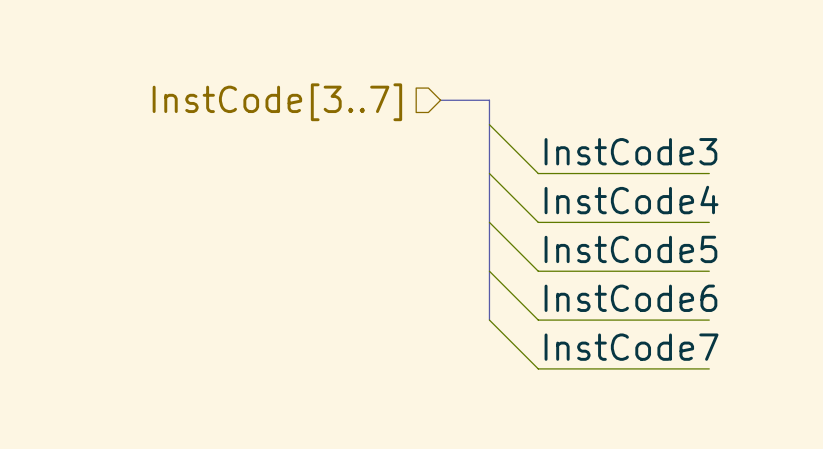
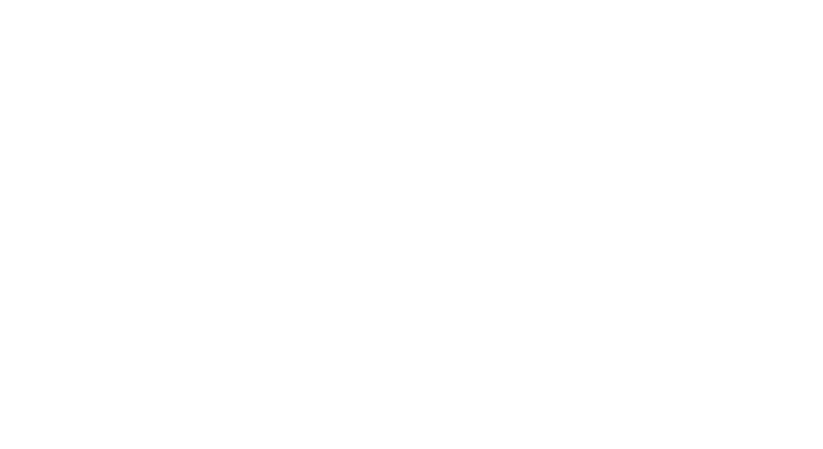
bus: (440, 100) (489, 100) (489, 320) -> none
hierarchical label: InstCode[3..7] (277, 102) -> none
wire: (489, 124) (538, 173) (709, 173) -> none
label: InstCode3 (630, 151) -> none
wire: (489, 173) (538, 222) (709, 222) -> none
label: InstCode4 (631, 200) -> none
wire: (489, 222) (538, 271) (709, 271) -> none
label: InstCode5 (630, 249) -> none
wire: (489, 271) (538, 320) (709, 320) -> none
label: InstCode6 (630, 298) -> none
wire: (489, 320) (538, 368) (709, 368) -> none
label: InstCode7 (631, 347) -> none

